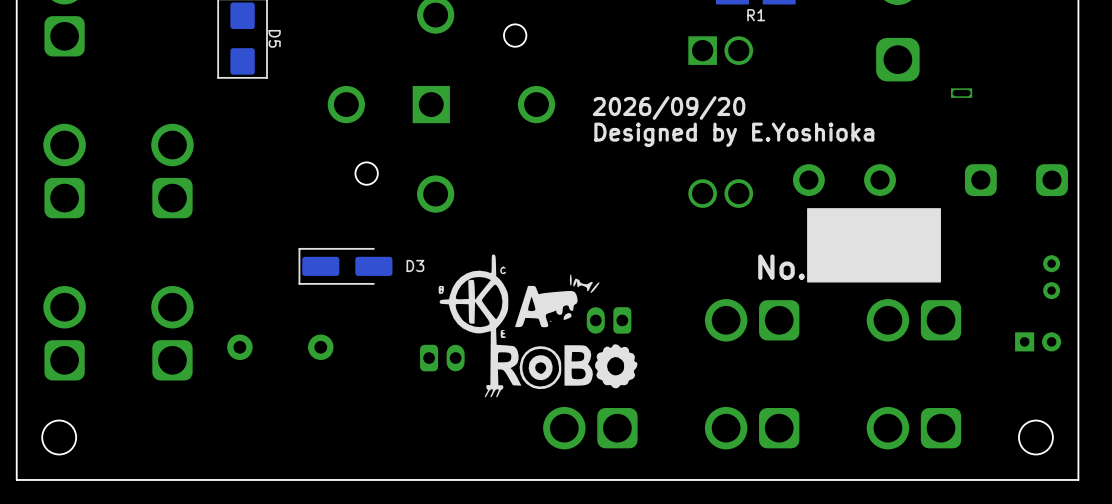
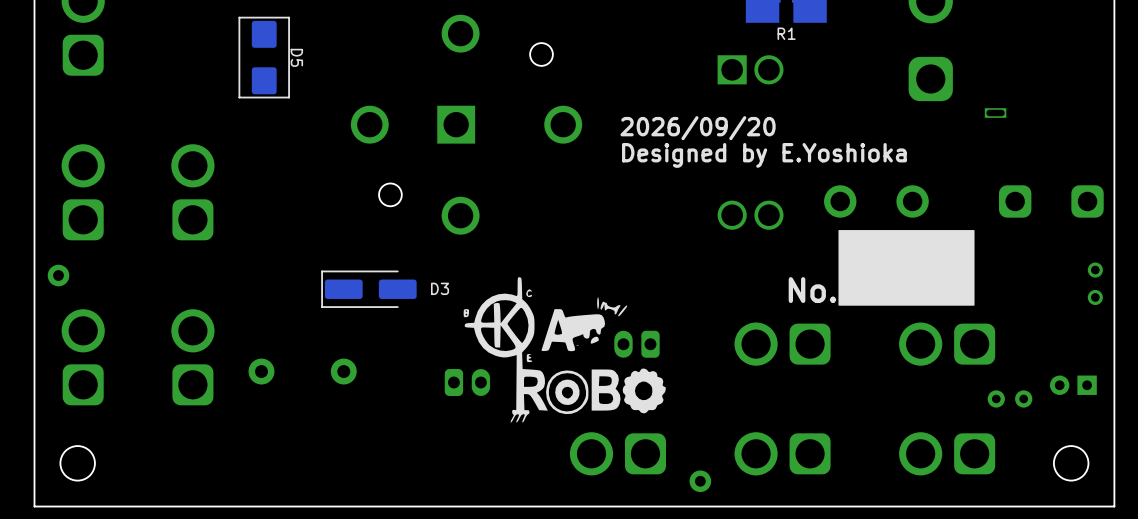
part: none -> (58, 275)
part: none -> (1095, 283)
part rotation: 0° (1051, 277) -> 90° clockwise (1009, 398)
part position: (1051, 277) -> (1009, 398)
part rotation: 0° (1038, 341) -> 180° (1073, 385)
part: none -> (700, 481)

